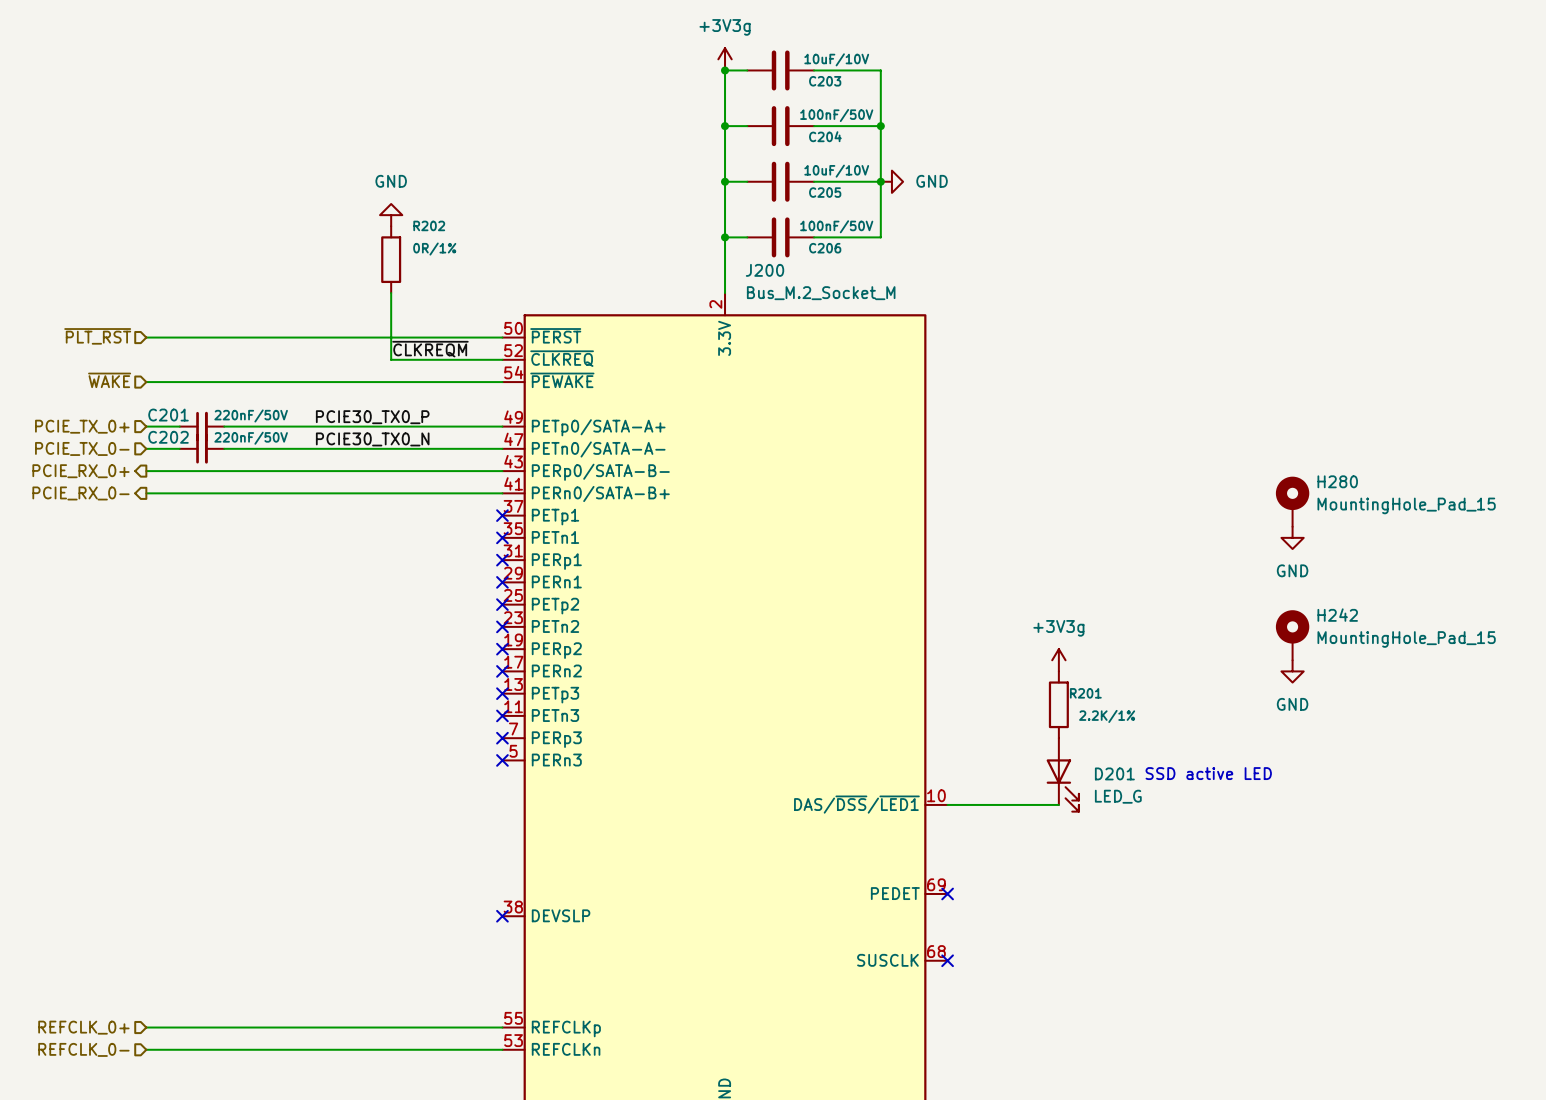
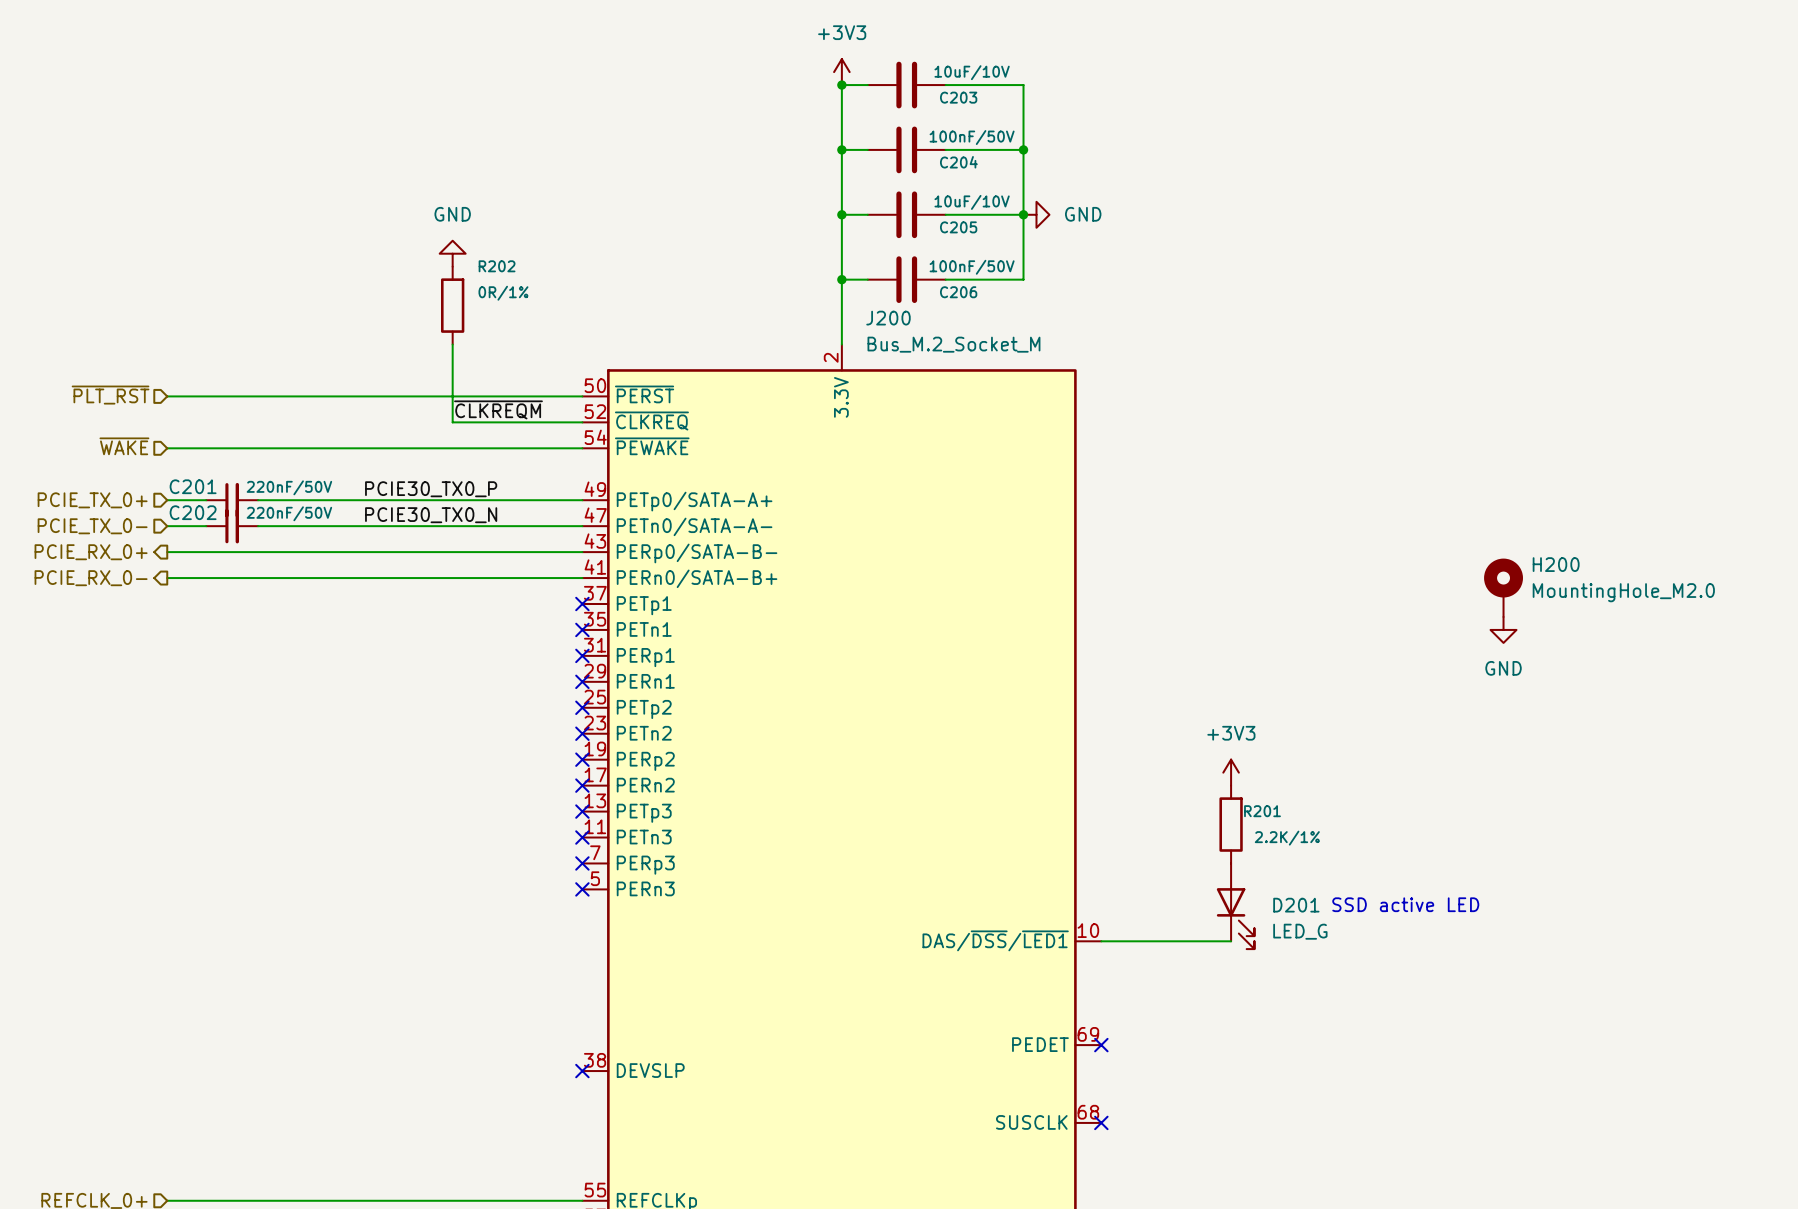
power symbol: +3V3g (725, 59) -> +3V3 (841, 72)
H280 name: H280 (1337, 481) -> H200 (1556, 564)
H280 value: MountingHole_Pad_15 (1406, 505) -> MountingHole_M2.0 (1623, 592)
H242: MountingHole_Pad_15 (1292, 635) -> none
power symbol: +3V3g (1058, 660) -> +3V3 (1231, 772)
power symbol: GND (1292, 671) -> none

